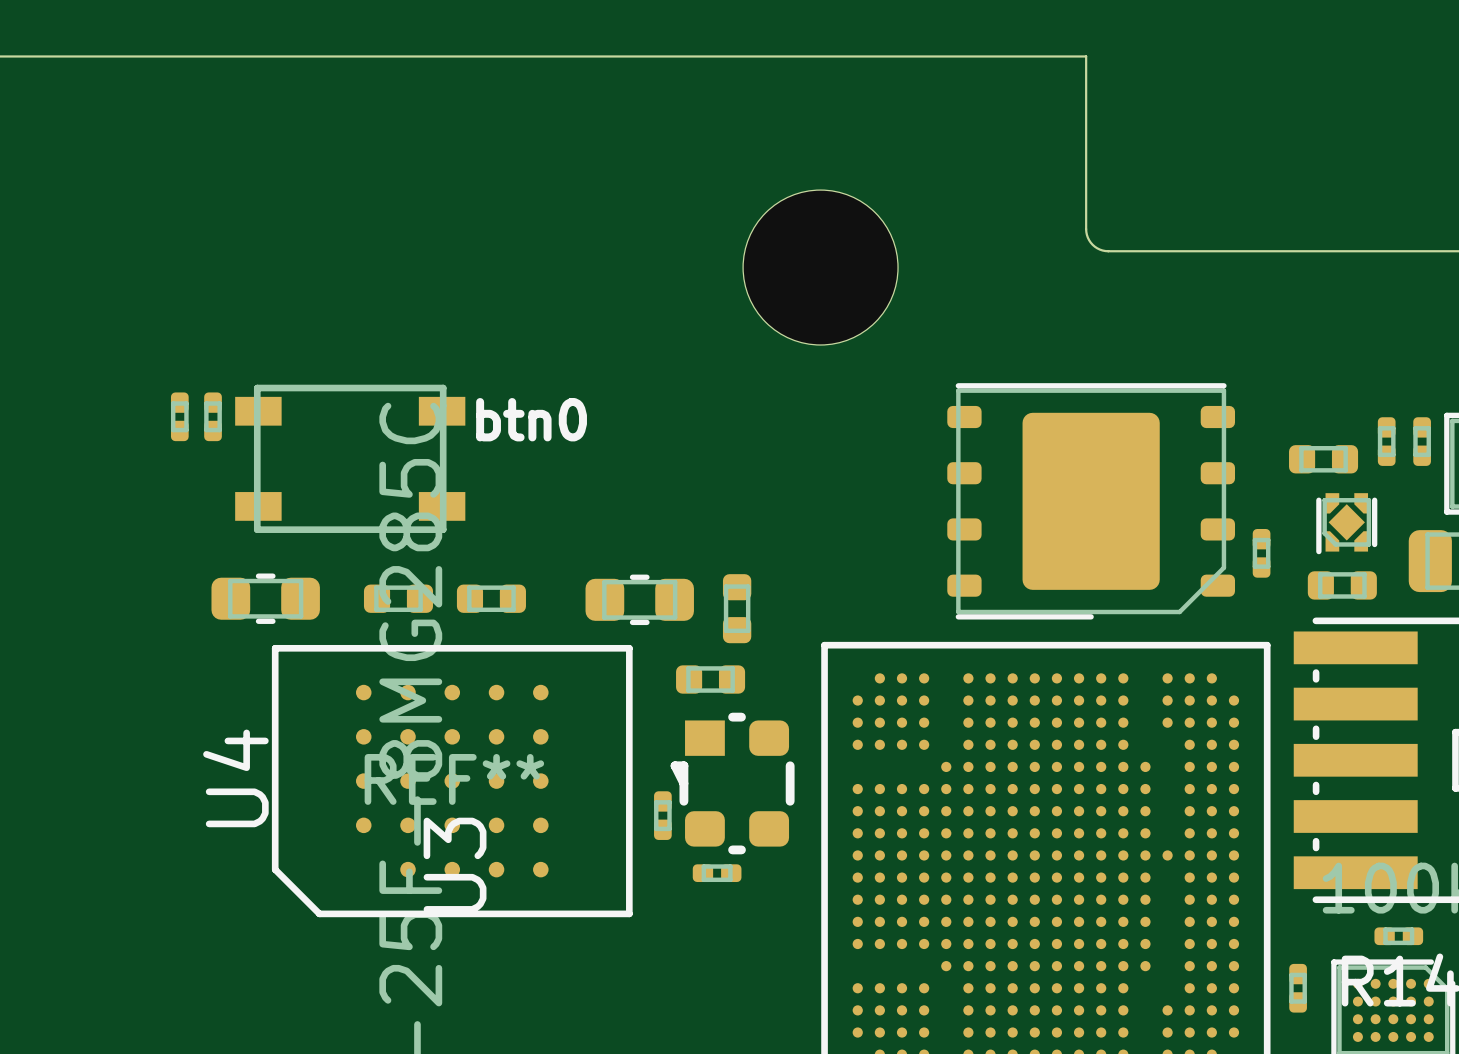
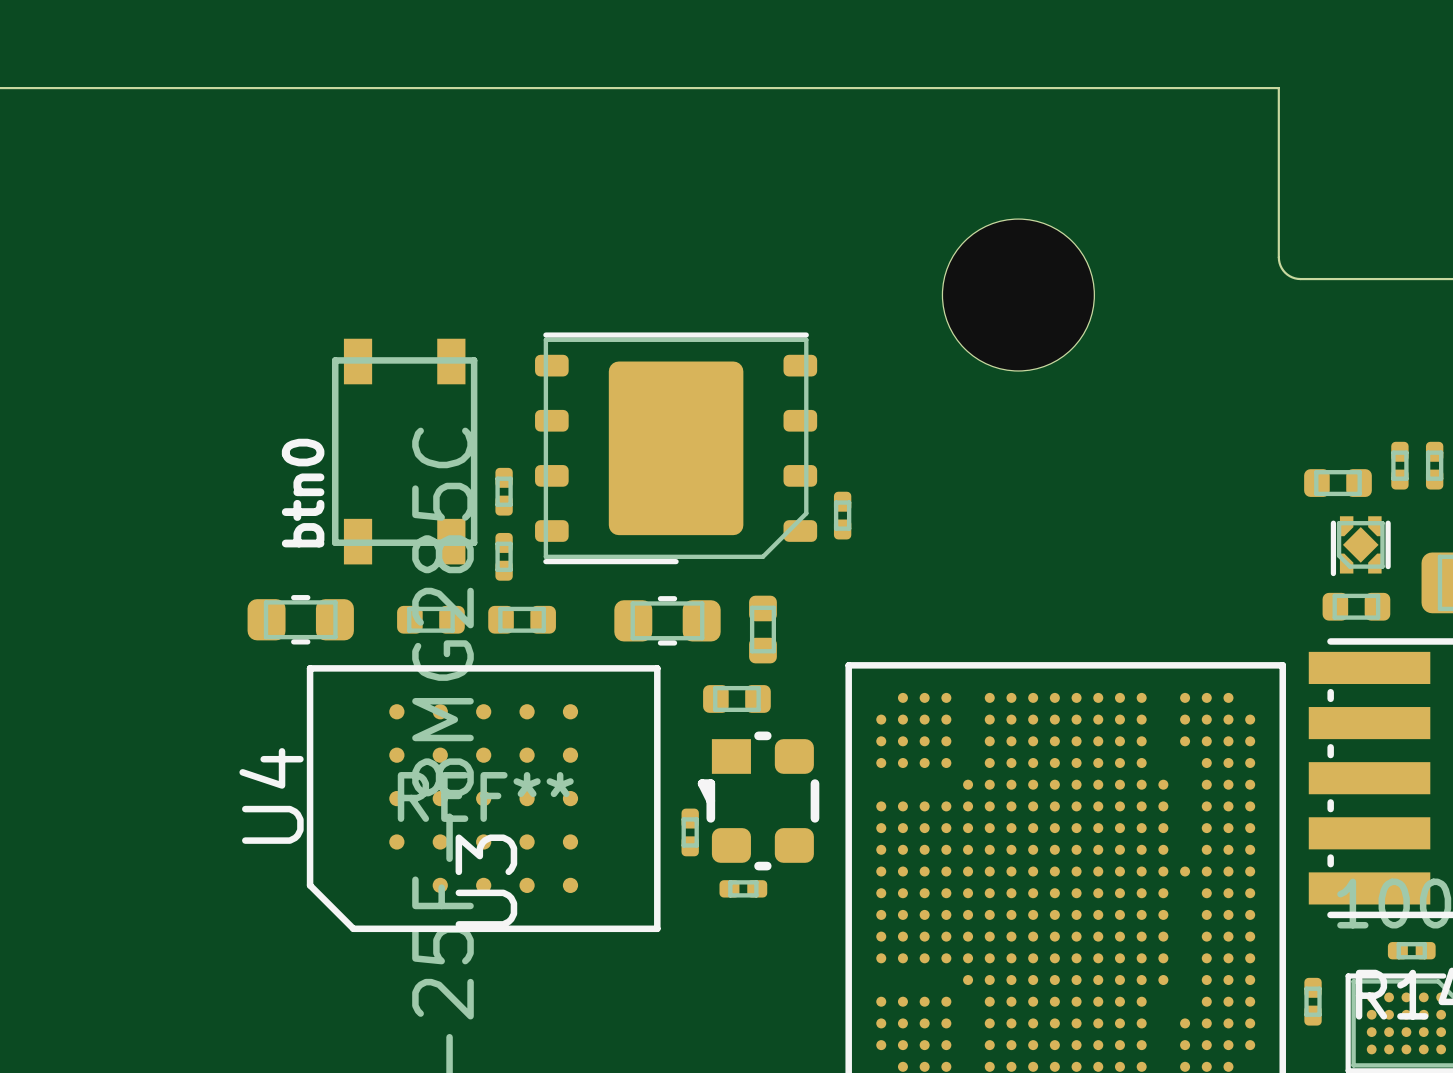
board edge: (1086, 56) (1086, 229) (1087, 237) (1092, 244) (1099, 249) (1108, 251) (1285, 251) -> (1105, 88) (1278, 88) (1279, 260) (1285, 272) (1292, 277) (1300, 279)
part position: (820, 267) -> (1018, 295)
part: (179, 416) -> none
part: (213, 416) -> none
text rotation: 0° (531, 419) -> 90° counterclockwise (303, 493)
text position: btn0 (531, 419) -> btn0 (303, 493)
part rotation: 0° (350, 458) -> 90° clockwise (404, 451)
part: none -> (504, 491)
part: none -> (842, 515)
part position: (1091, 501) -> (676, 448)
part: none -> (504, 556)
part: (1261, 553) -> none

